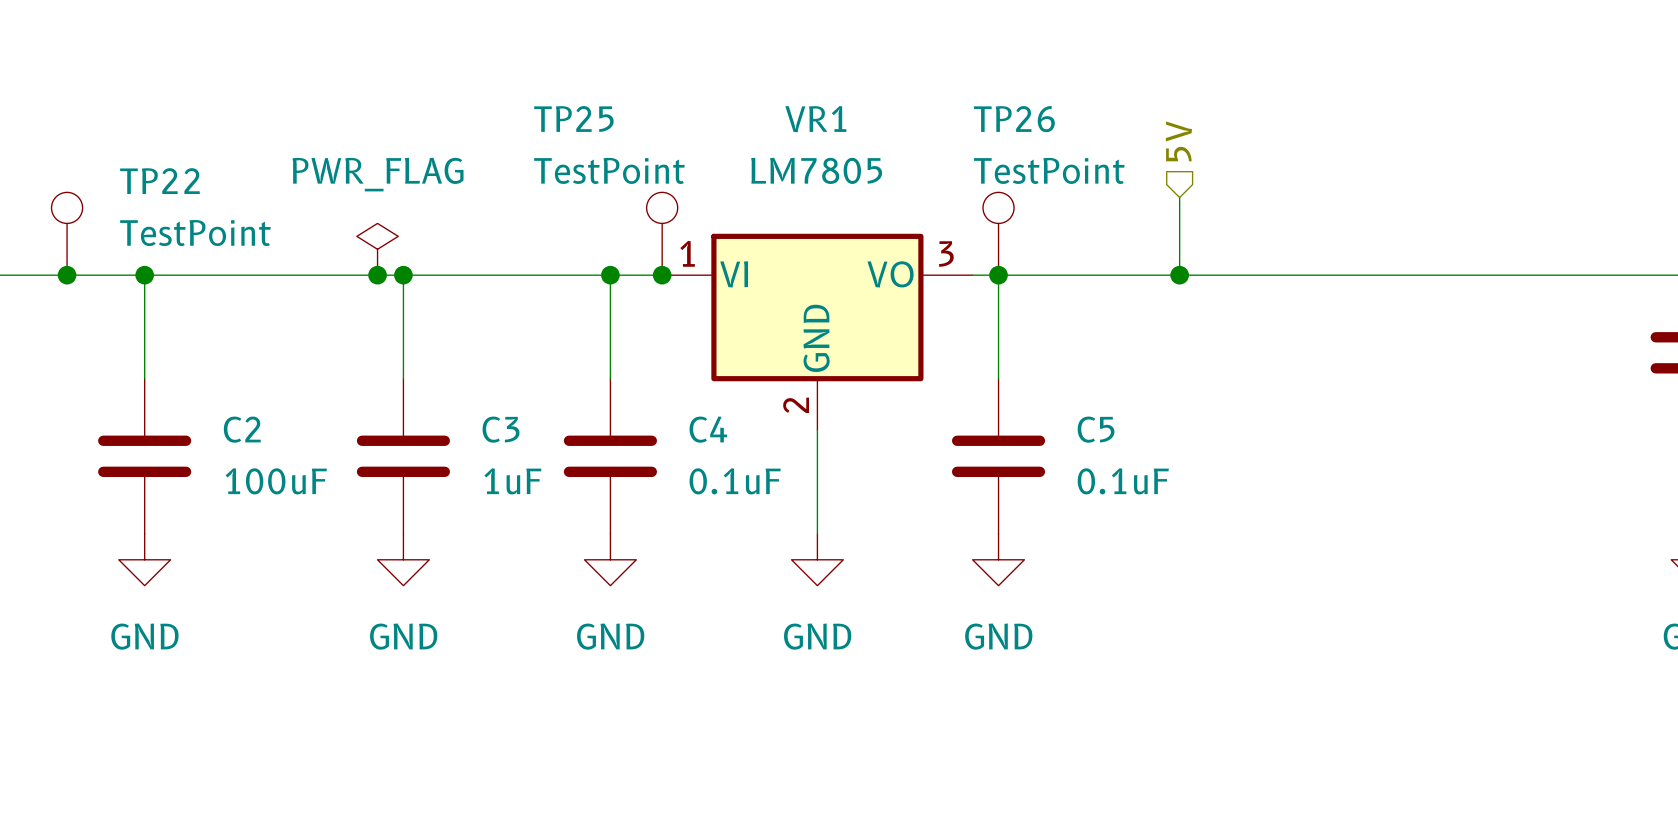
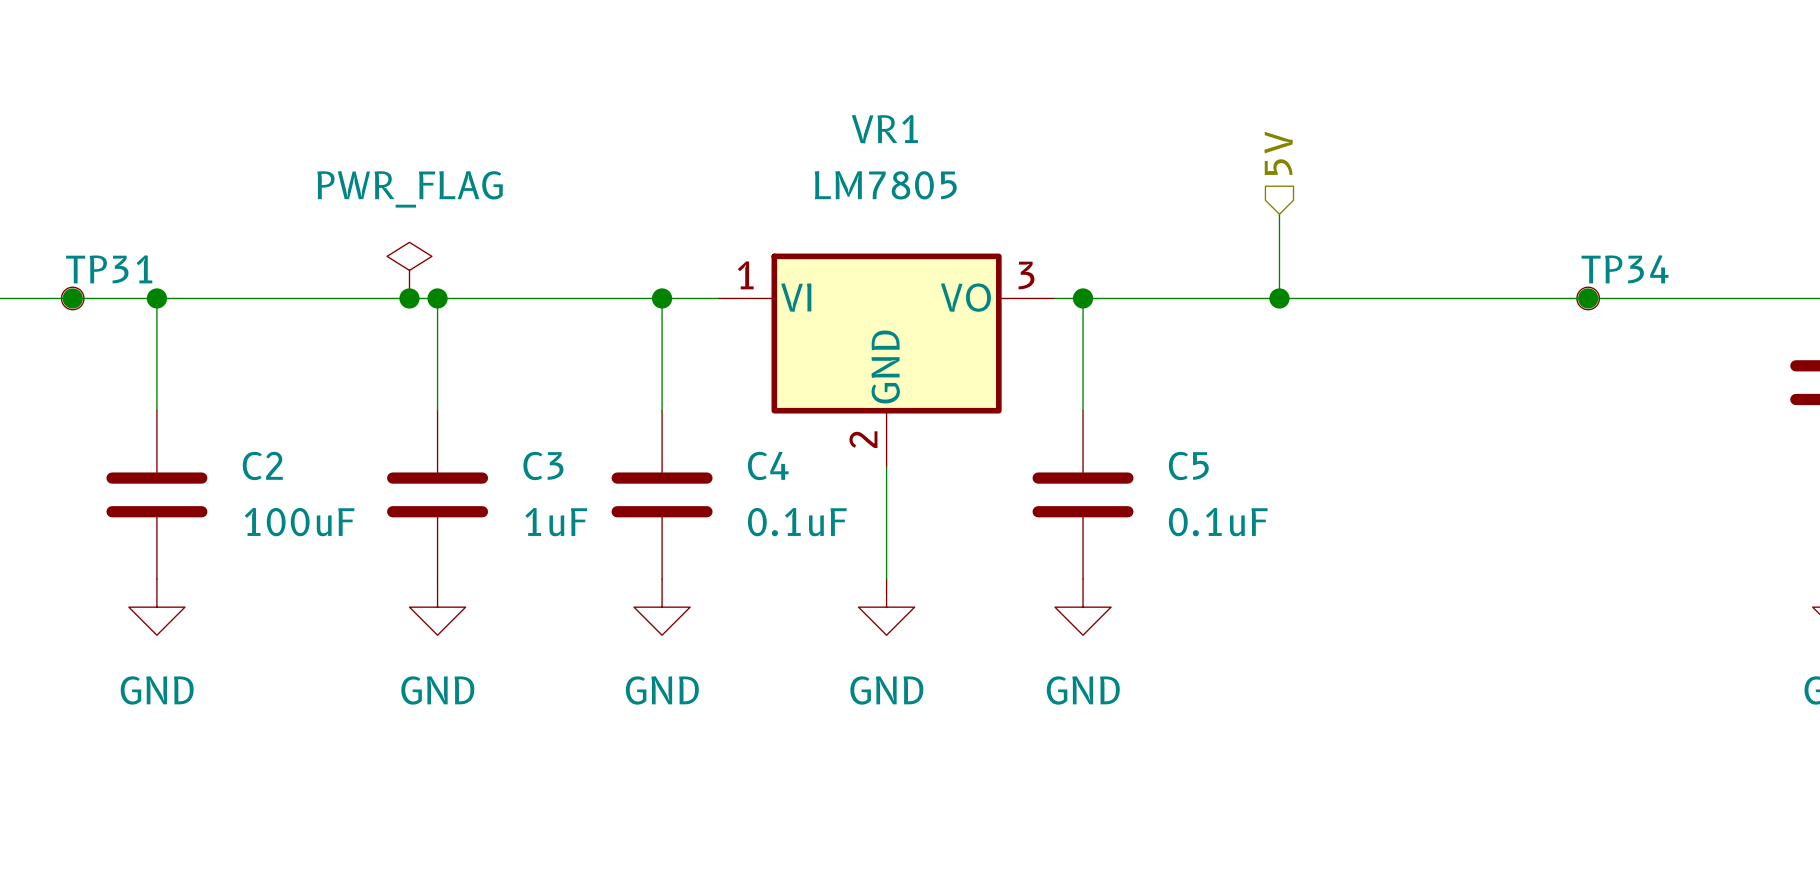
TP22: TestPoint (67, 233) -> none
TP25: TestPoint (662, 233) -> none
TP26: TestPoint (998, 233) -> none
TP31: none -> (72, 298)
junction: (662, 275) -> none
junction: none -> (1588, 298)
TP34: none -> (1588, 298)

